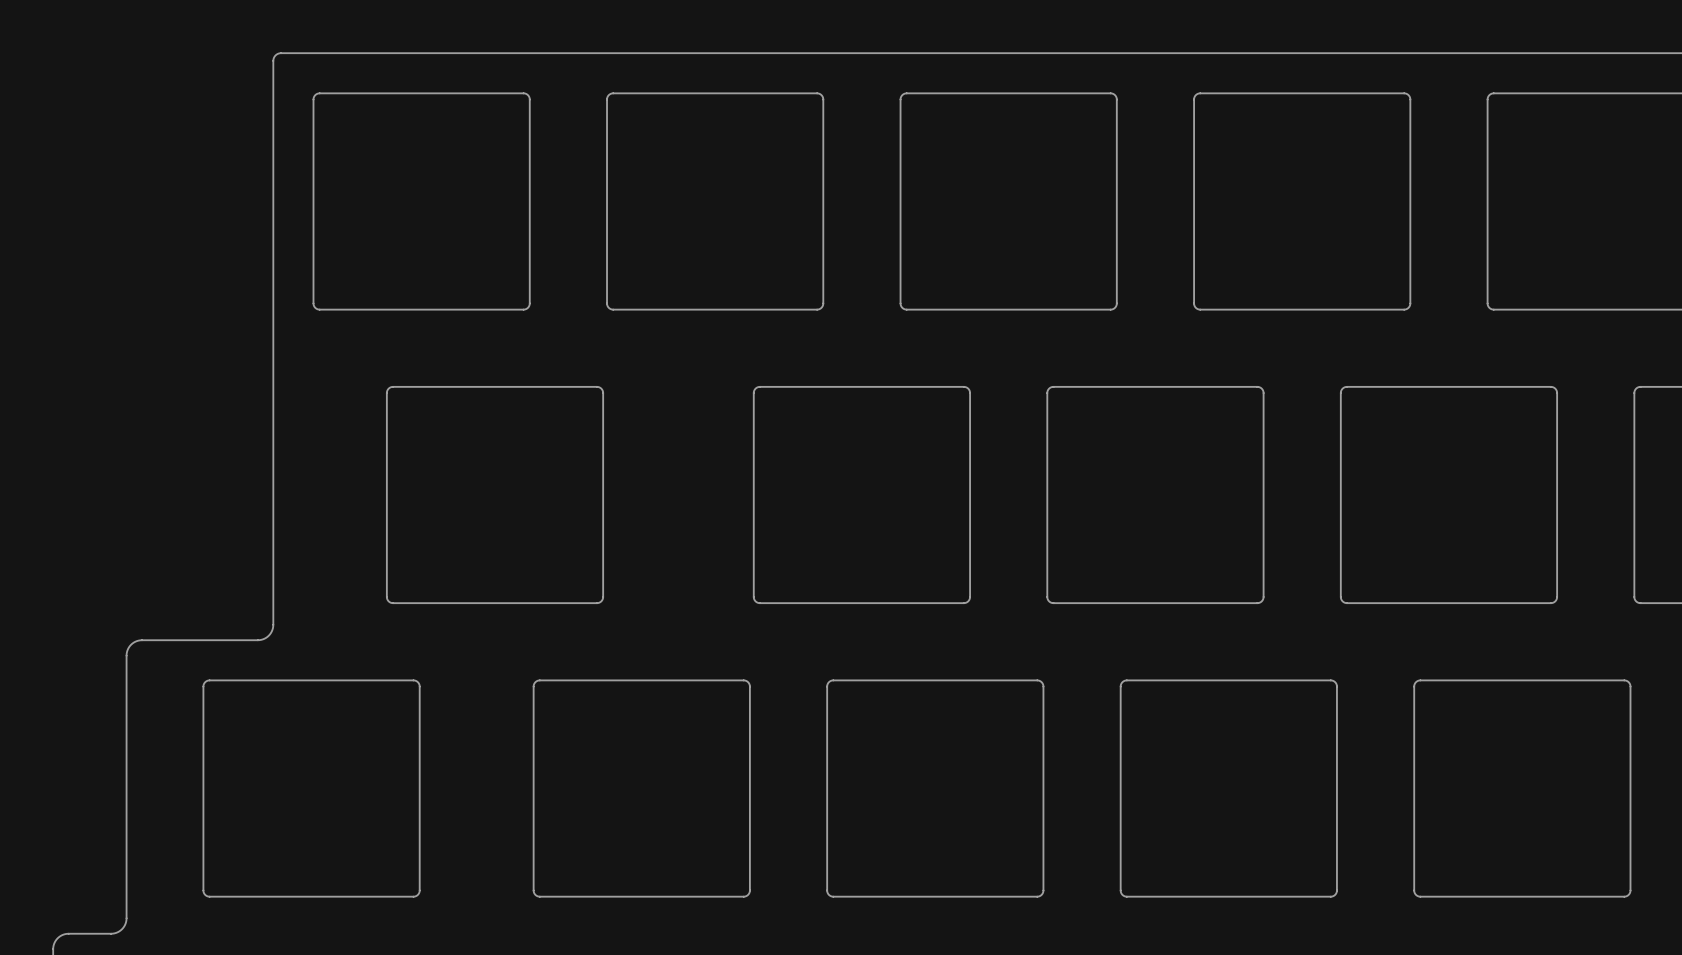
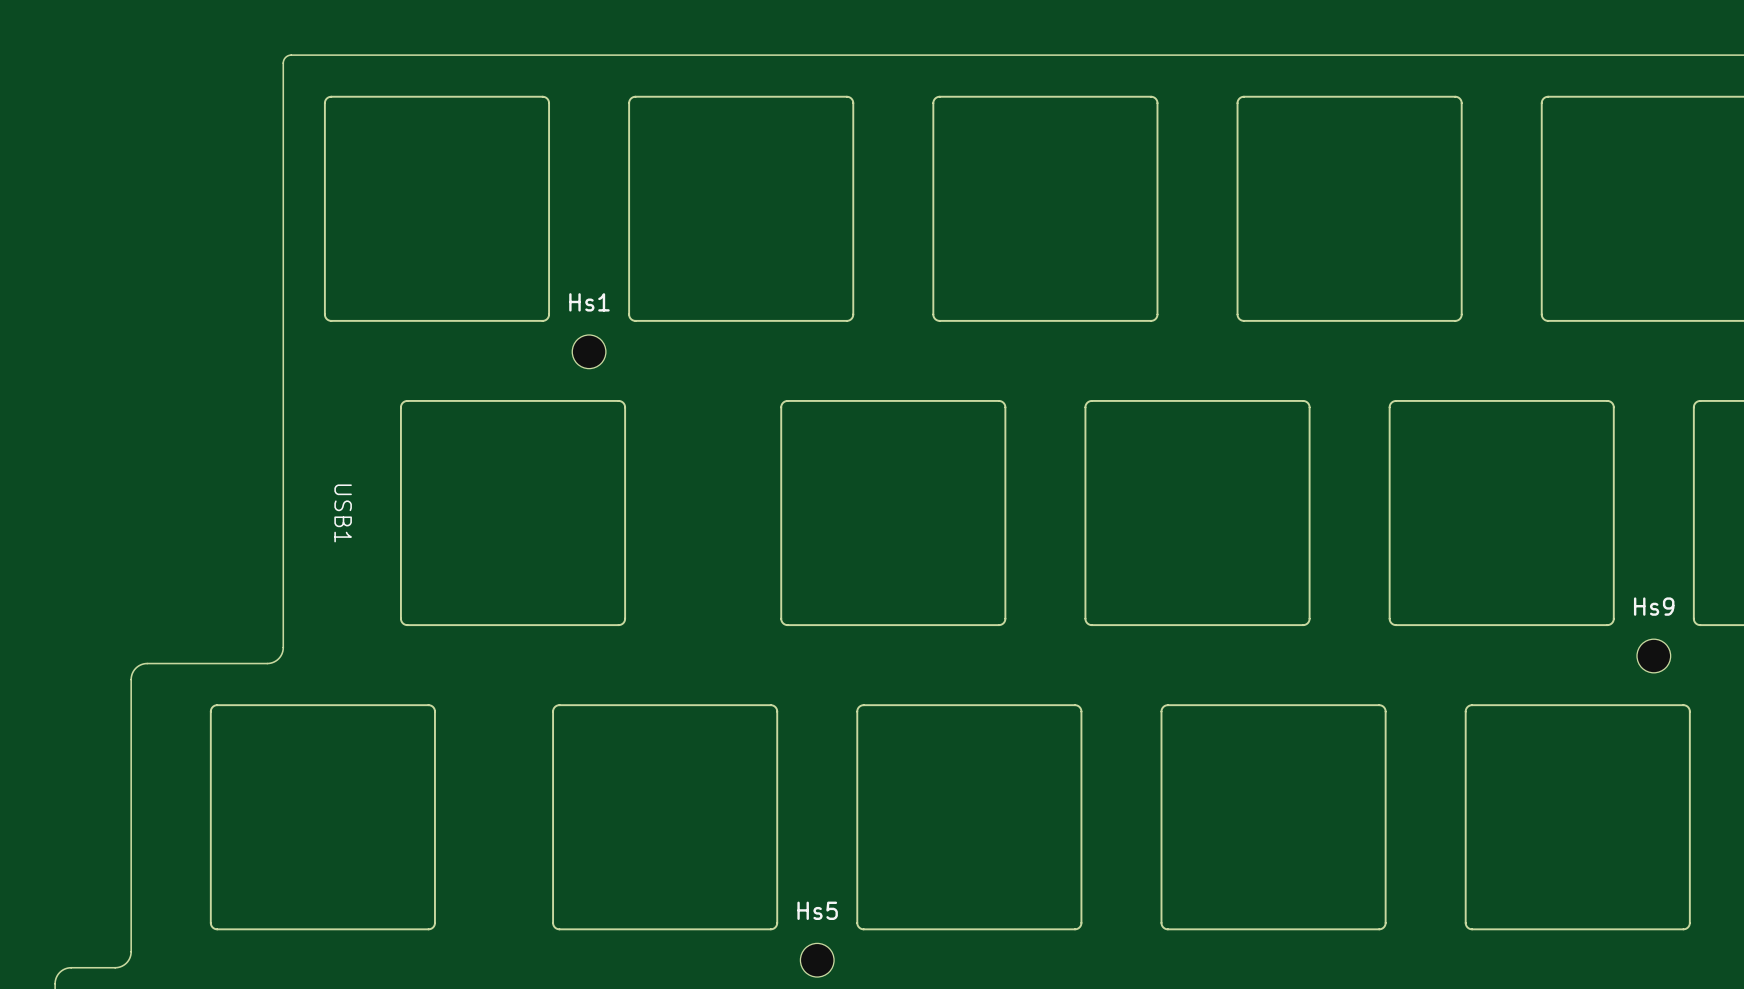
Hs1: none -> (589, 351)
USB1: none -> (343, 513)
Hs9: none -> (1653, 656)
Hs5: none -> (817, 960)

